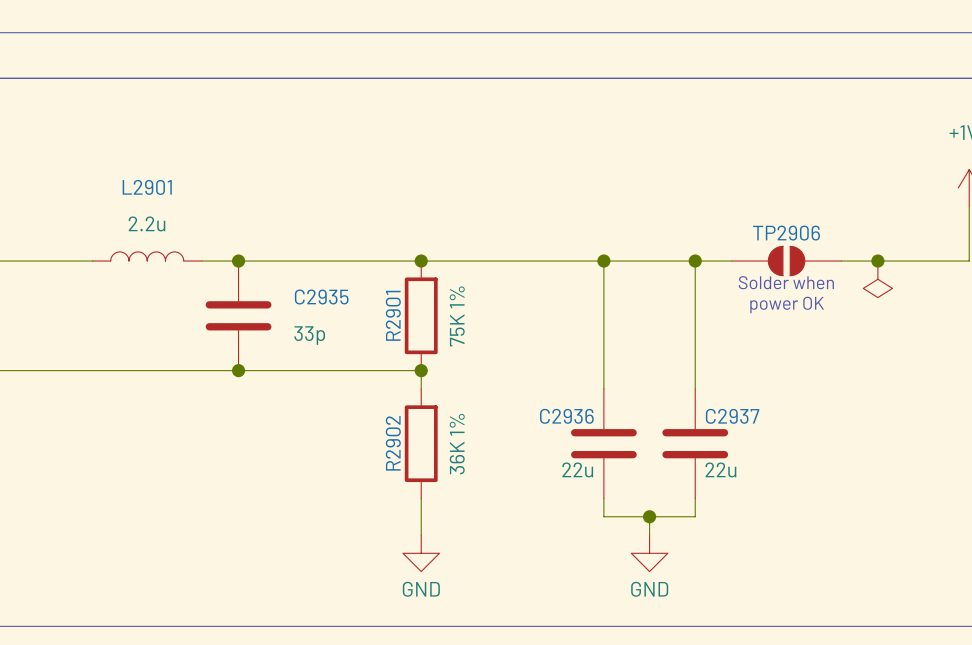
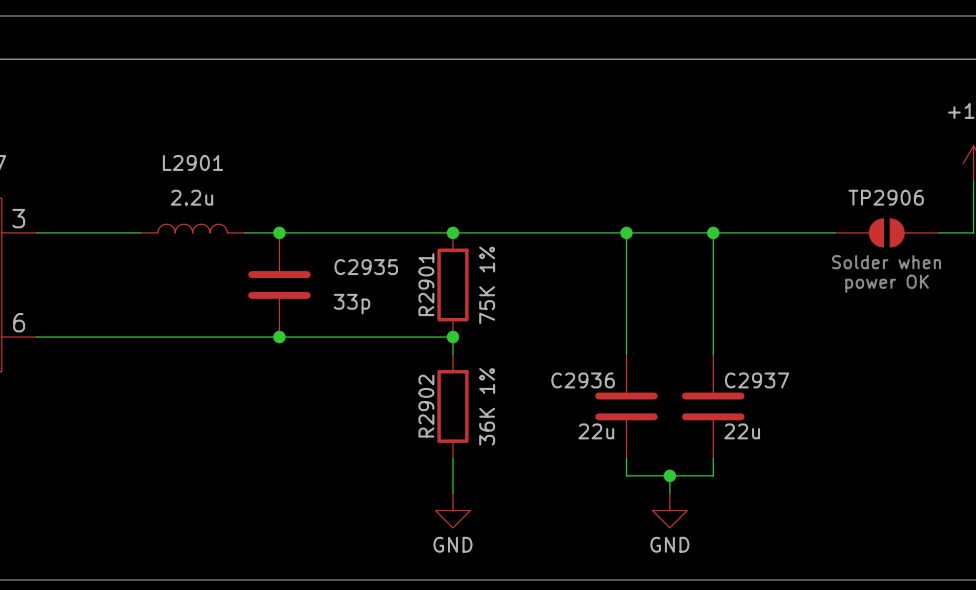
TP2906 name position: TP2906 (786, 233) -> TP2906 (886, 197)
TP2906 position: (786, 261) -> (886, 232)
junction: (877, 261) -> none
power symbol: (877, 279) -> none
text position: Solder when (786, 282) -> Solder when (886, 262)
text position: power OK (787, 304) -> power OK (887, 283)

